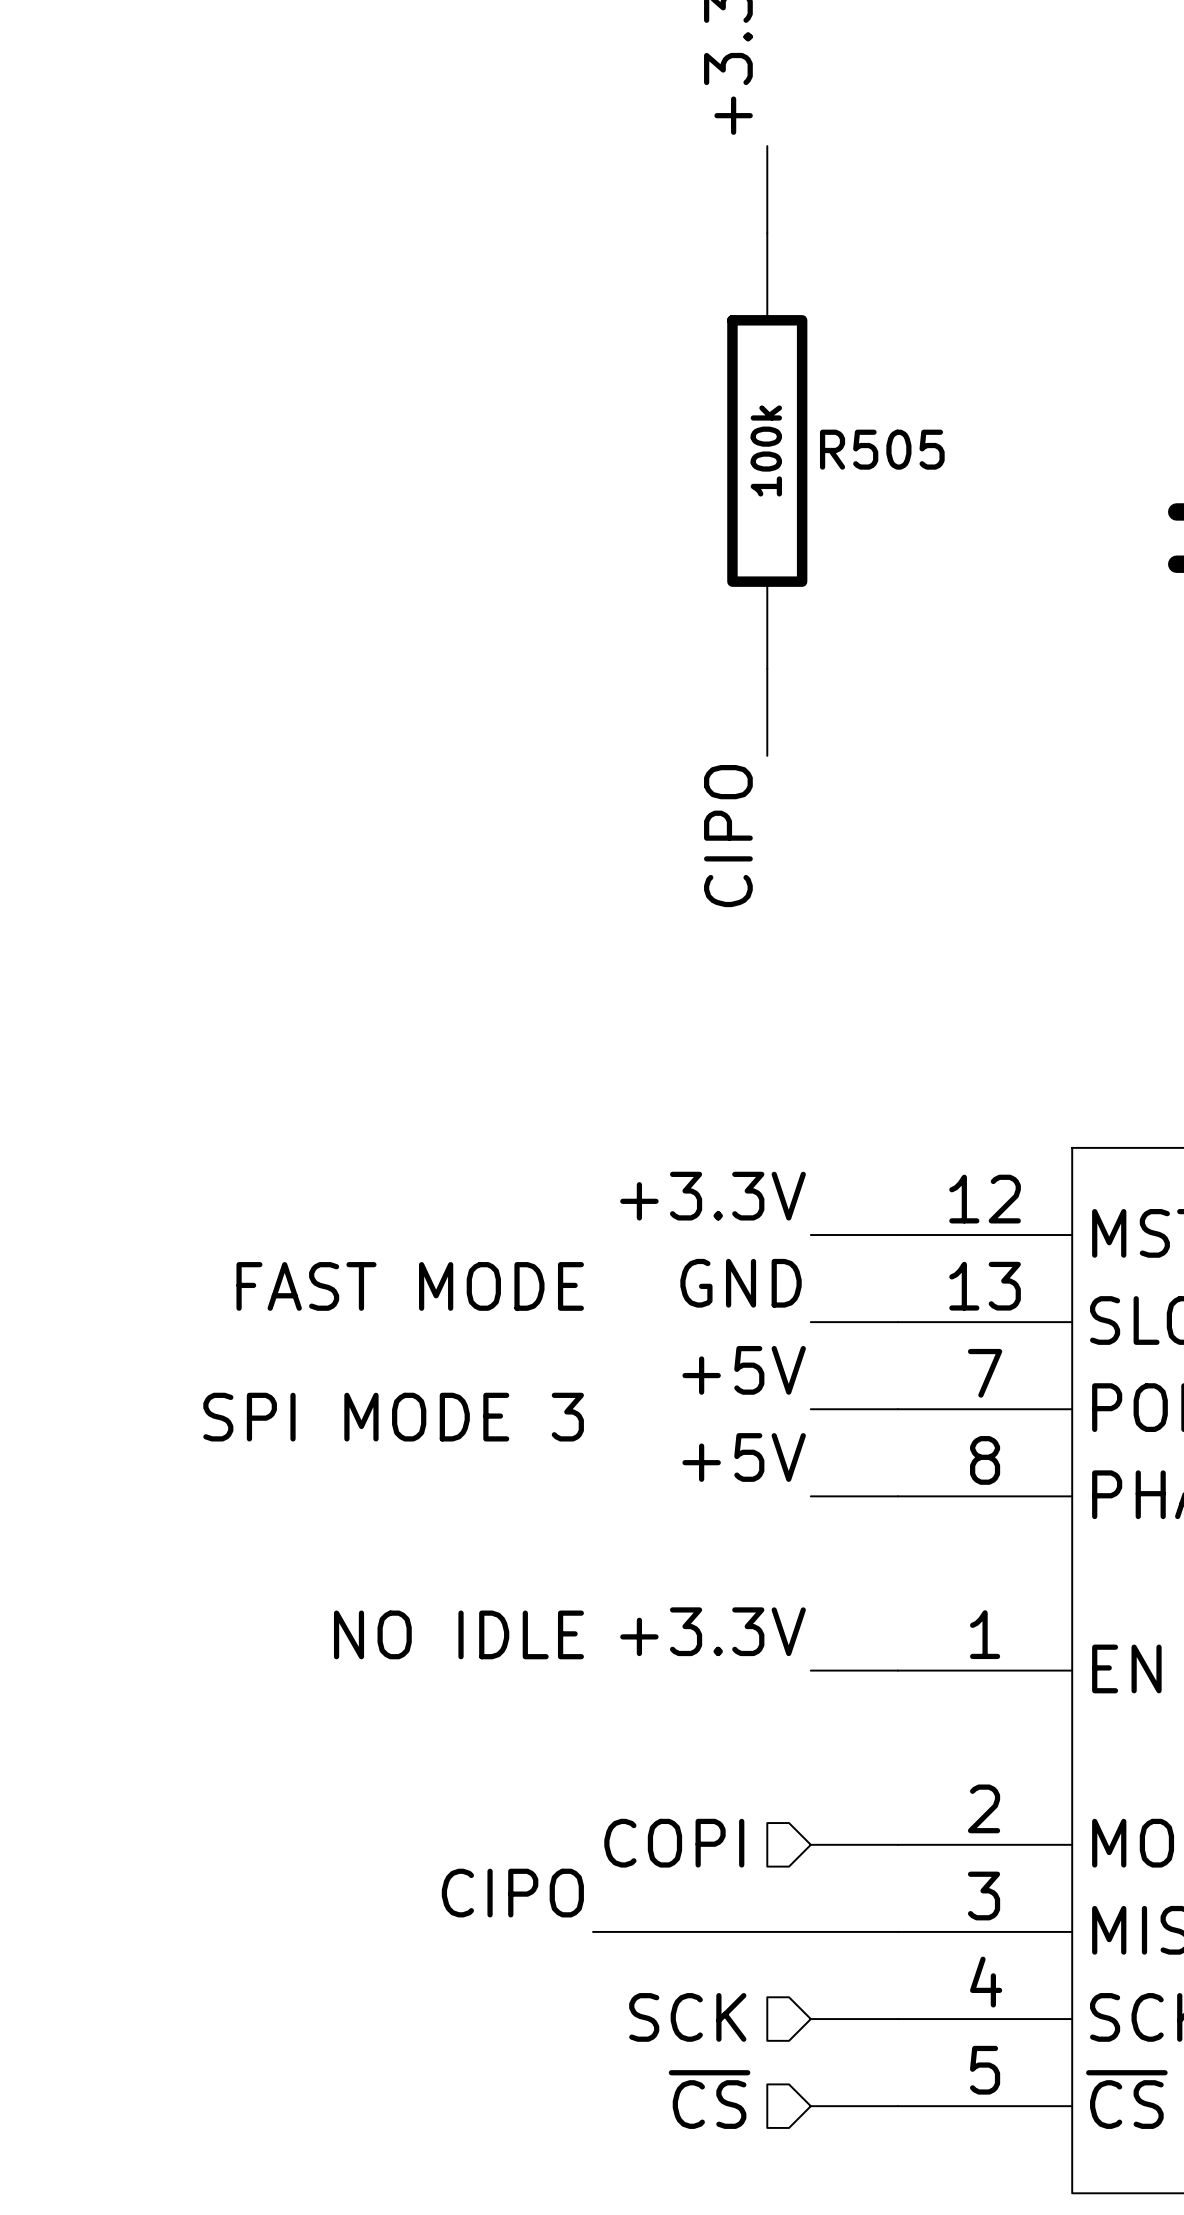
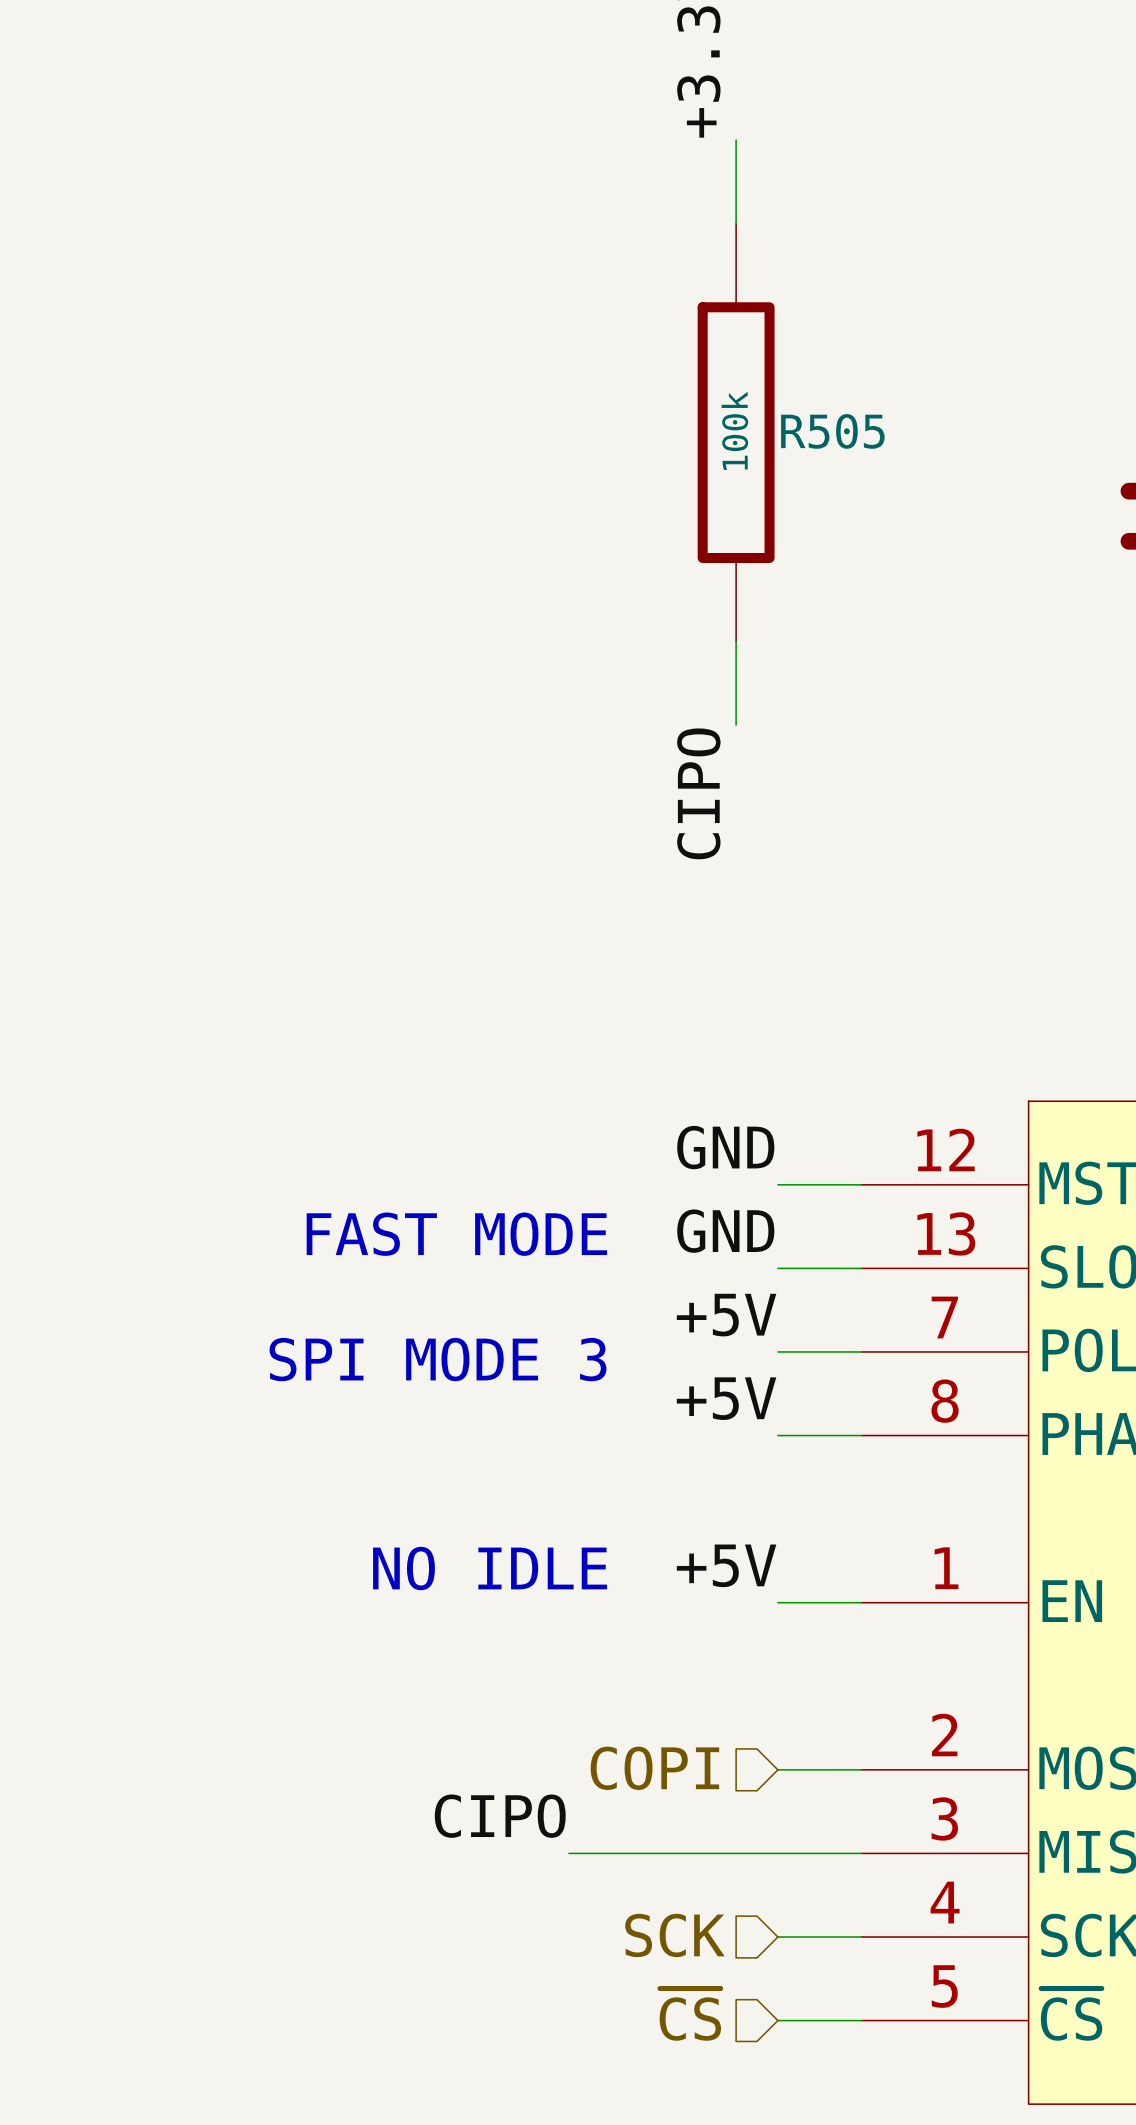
label: +3.3V (713, 1196) -> GND (725, 1147)
text position: FAST MODE (410, 1286) -> FAST MODE (456, 1234)
text position: SPI MODE 3 (393, 1417) -> SPI MODE 3 (437, 1359)
label: +3.3V (713, 1631) -> +5V (726, 1565)
text position: NO IDLE (458, 1634) -> NO IDLE (490, 1568)

